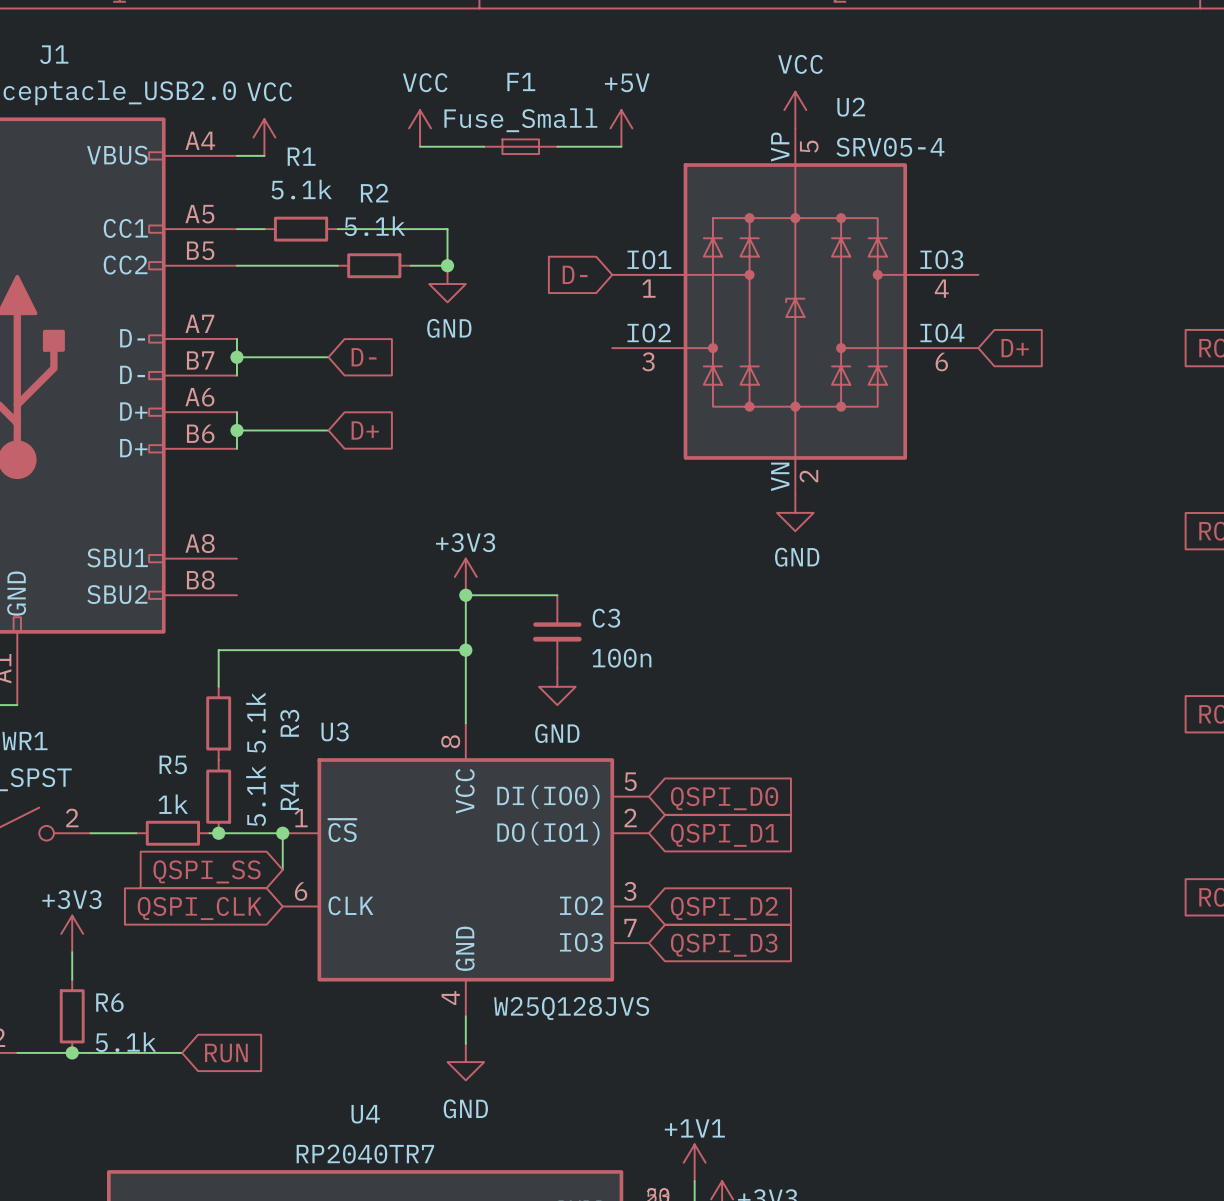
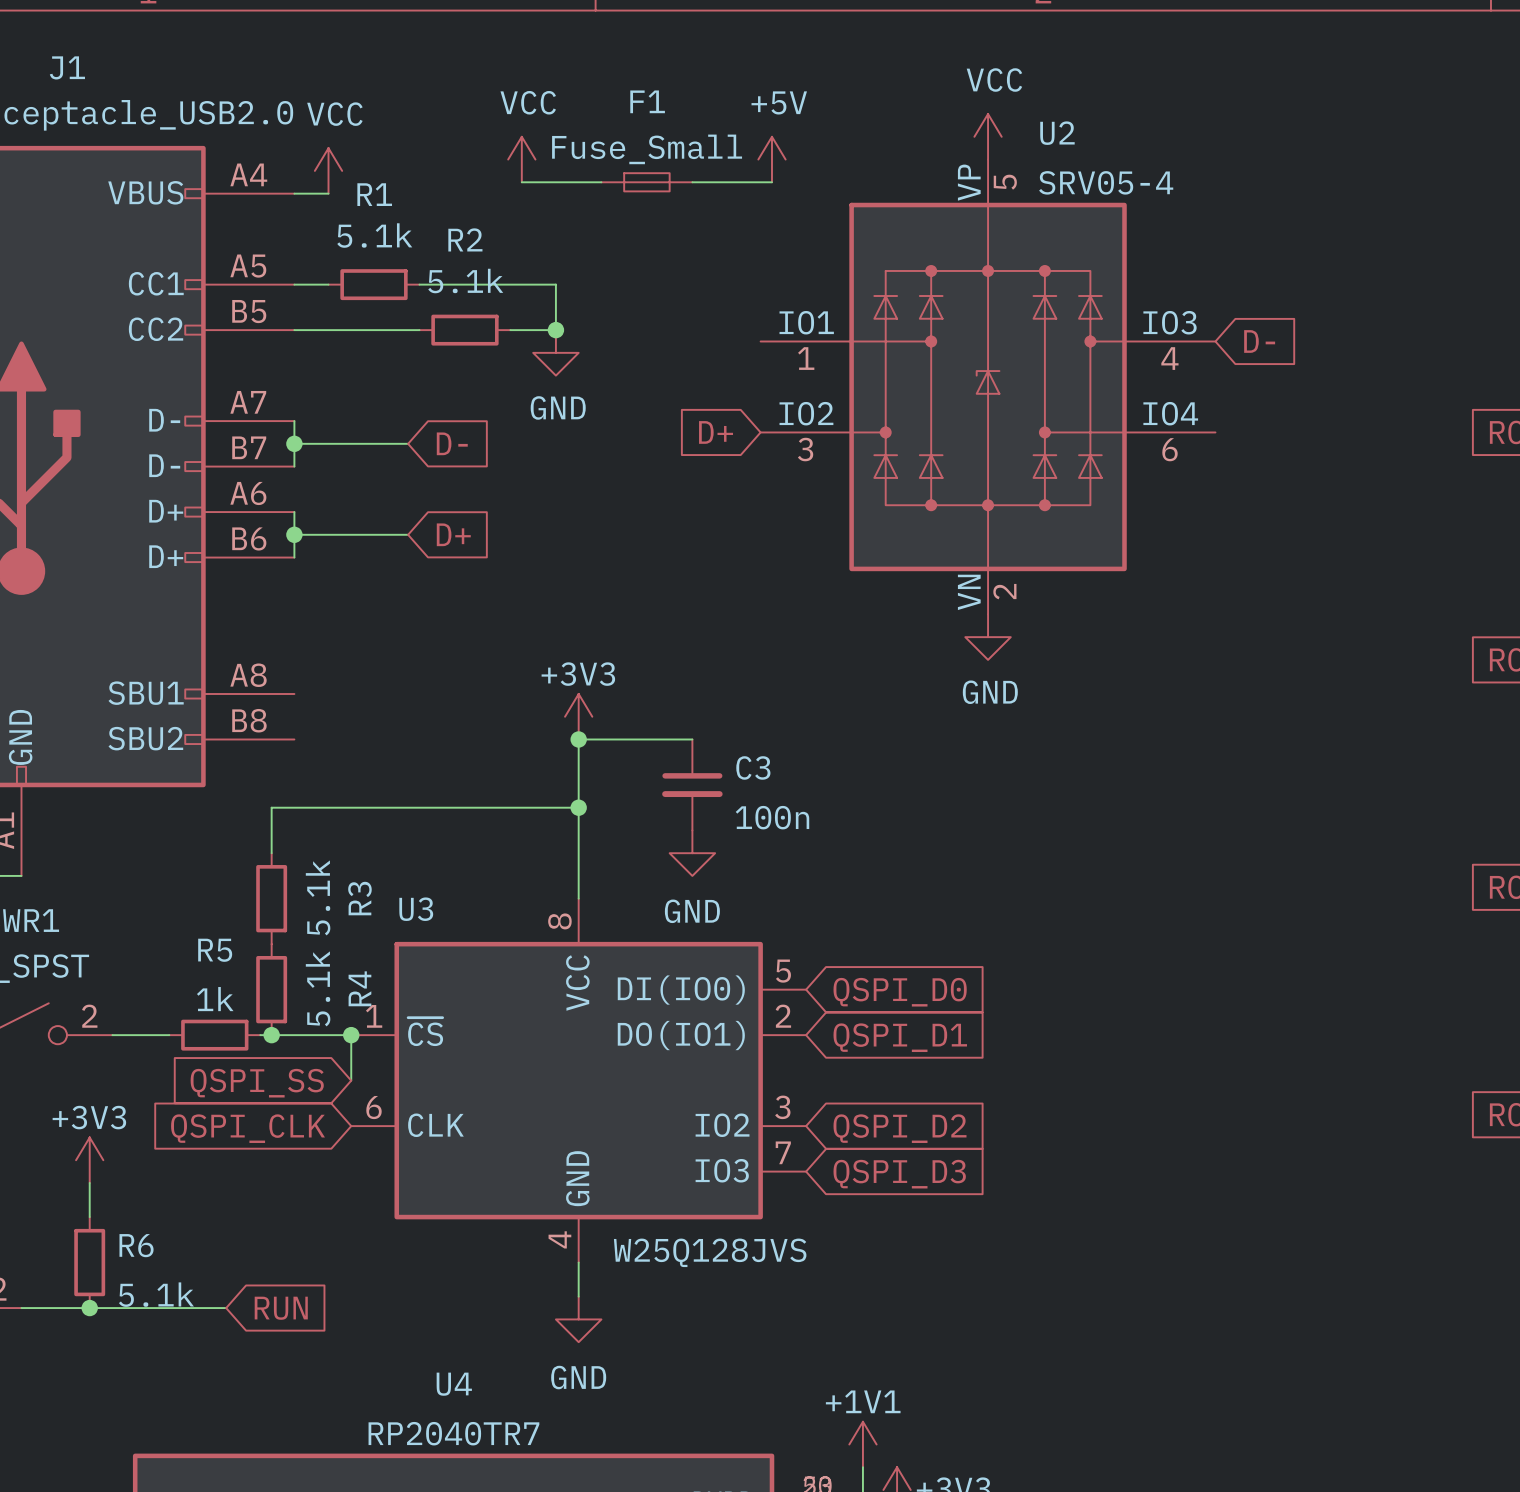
global label: D- (575, 274) -> none
global label: none -> D- (1259, 341)
global label: none -> D+ (716, 432)
global label: D+ (1015, 348) -> none

